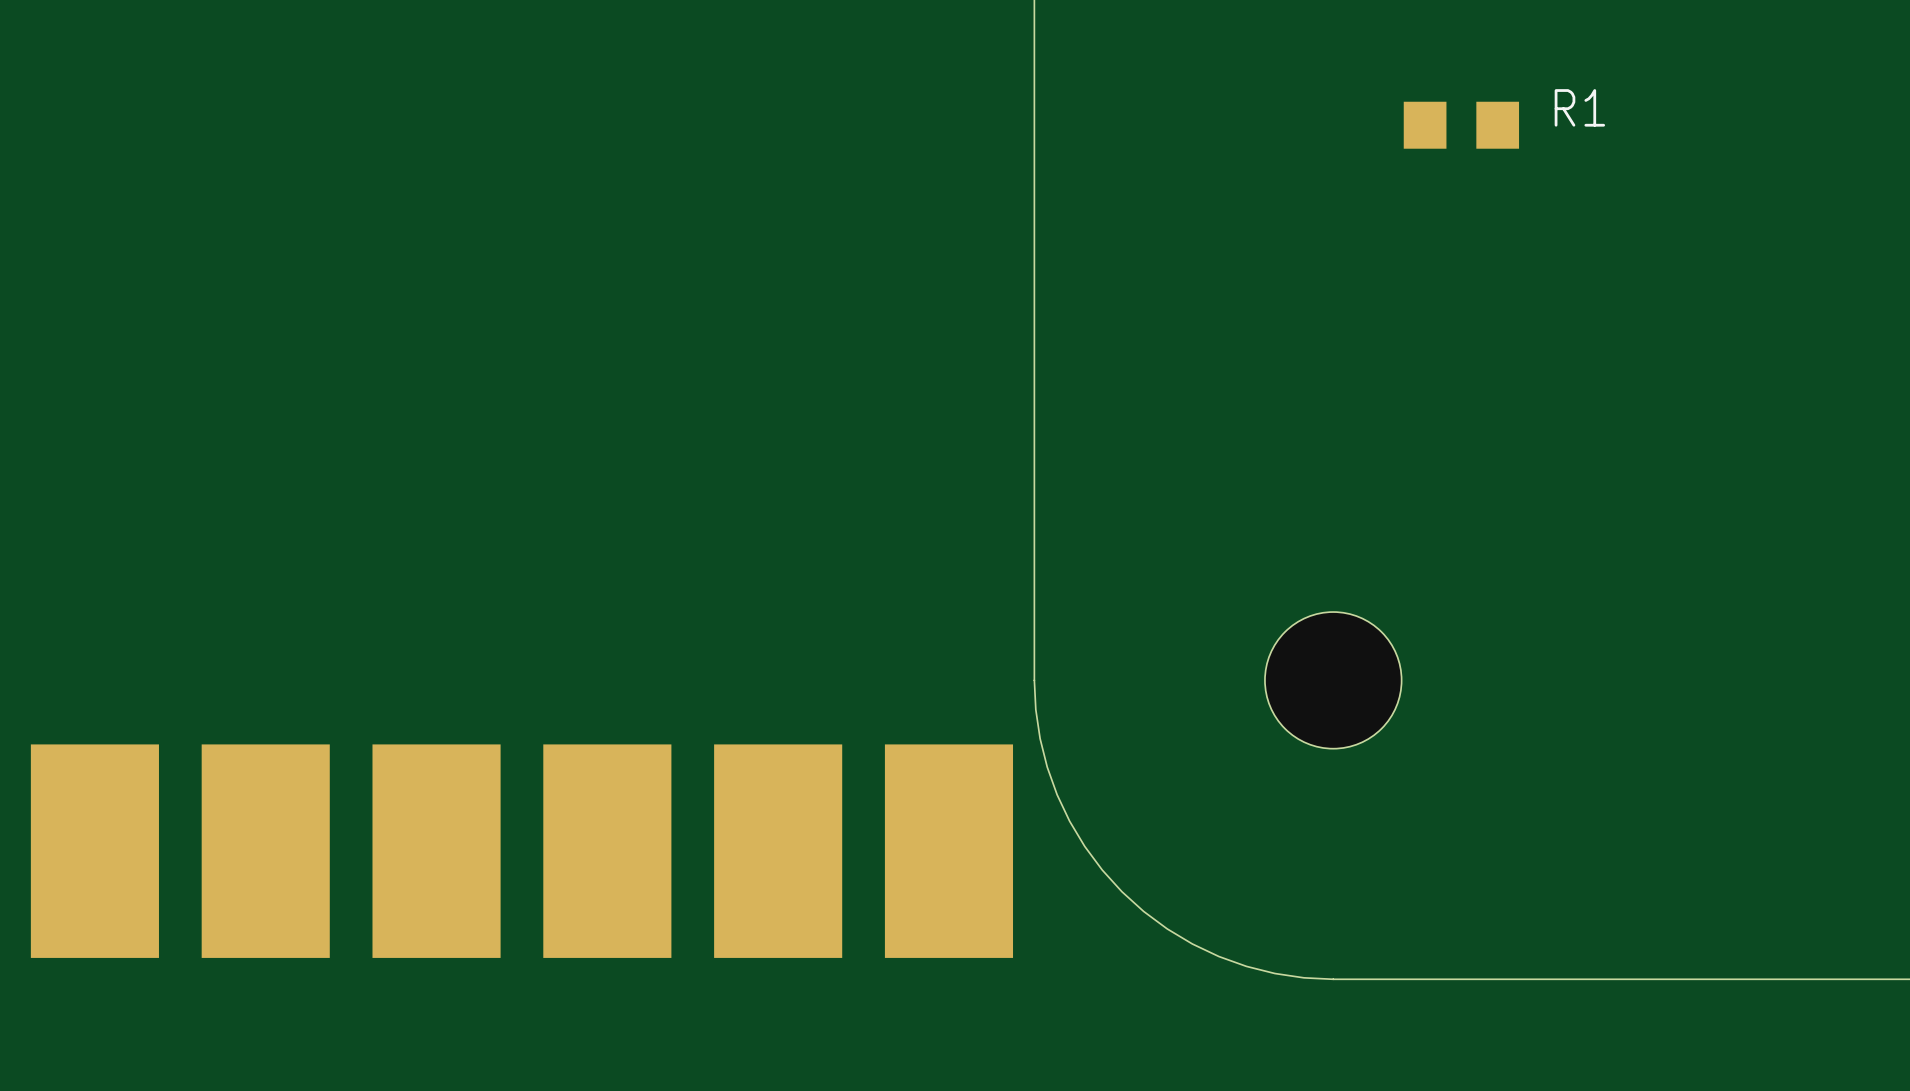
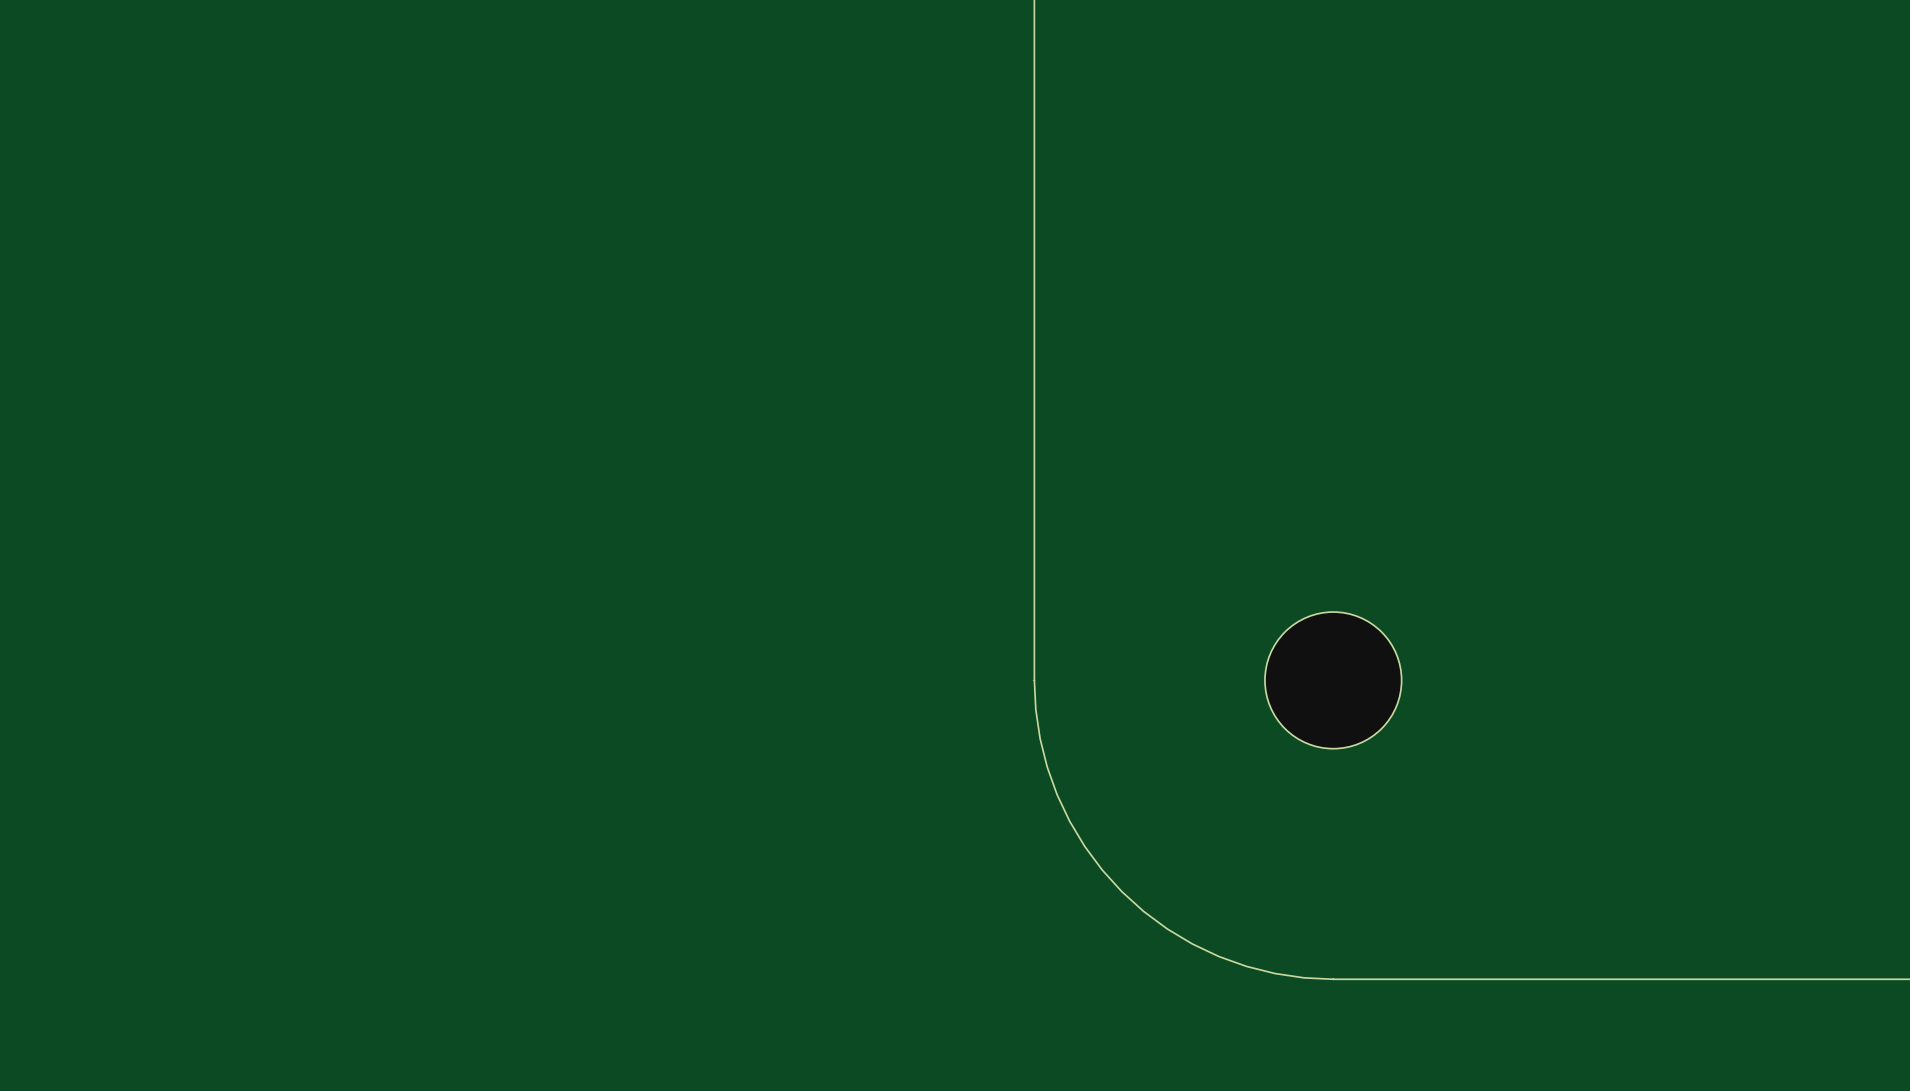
R1: (1461, 125) -> none
part: (94, 851) -> none
part: (265, 851) -> none
part: (436, 851) -> none
part: (607, 851) -> none
part: (778, 851) -> none
part: (948, 851) -> none

